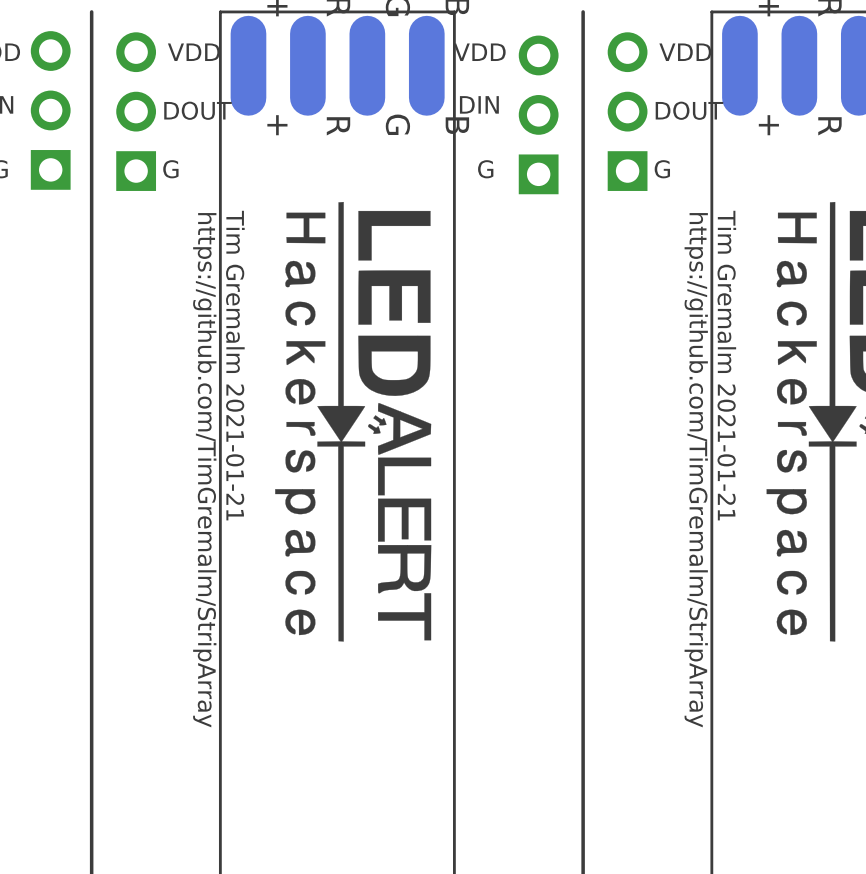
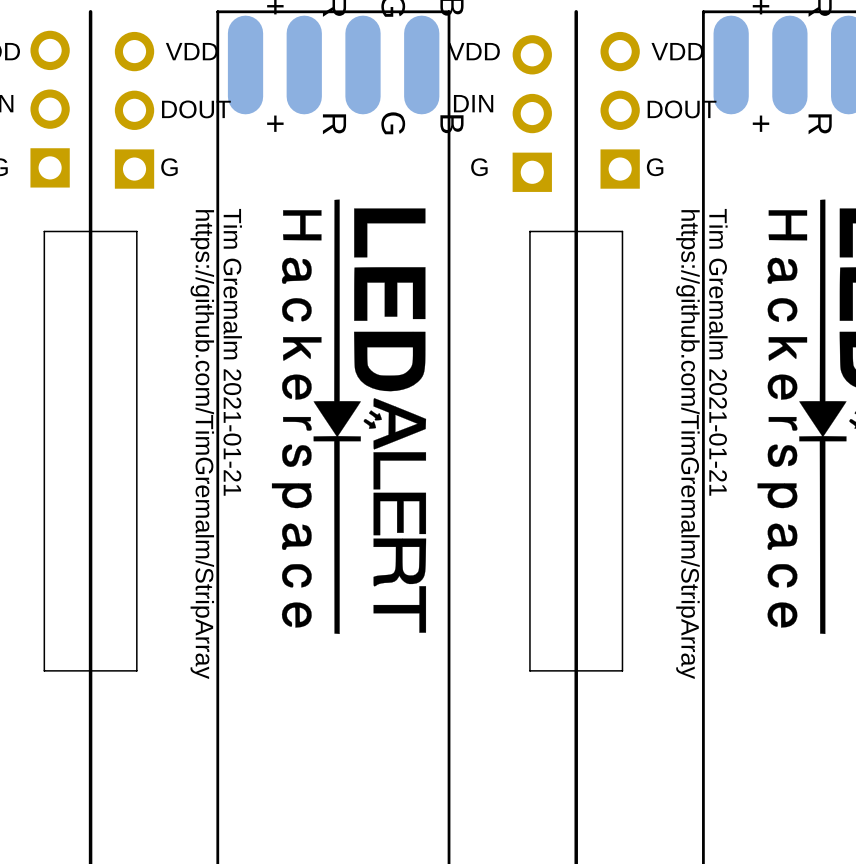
board edge: none -> (136, 231) (136, 670) (44, 670) (44, 231) (136, 231)
board edge: none -> (622, 231) (529, 231) (529, 670) (622, 670) (622, 231)

